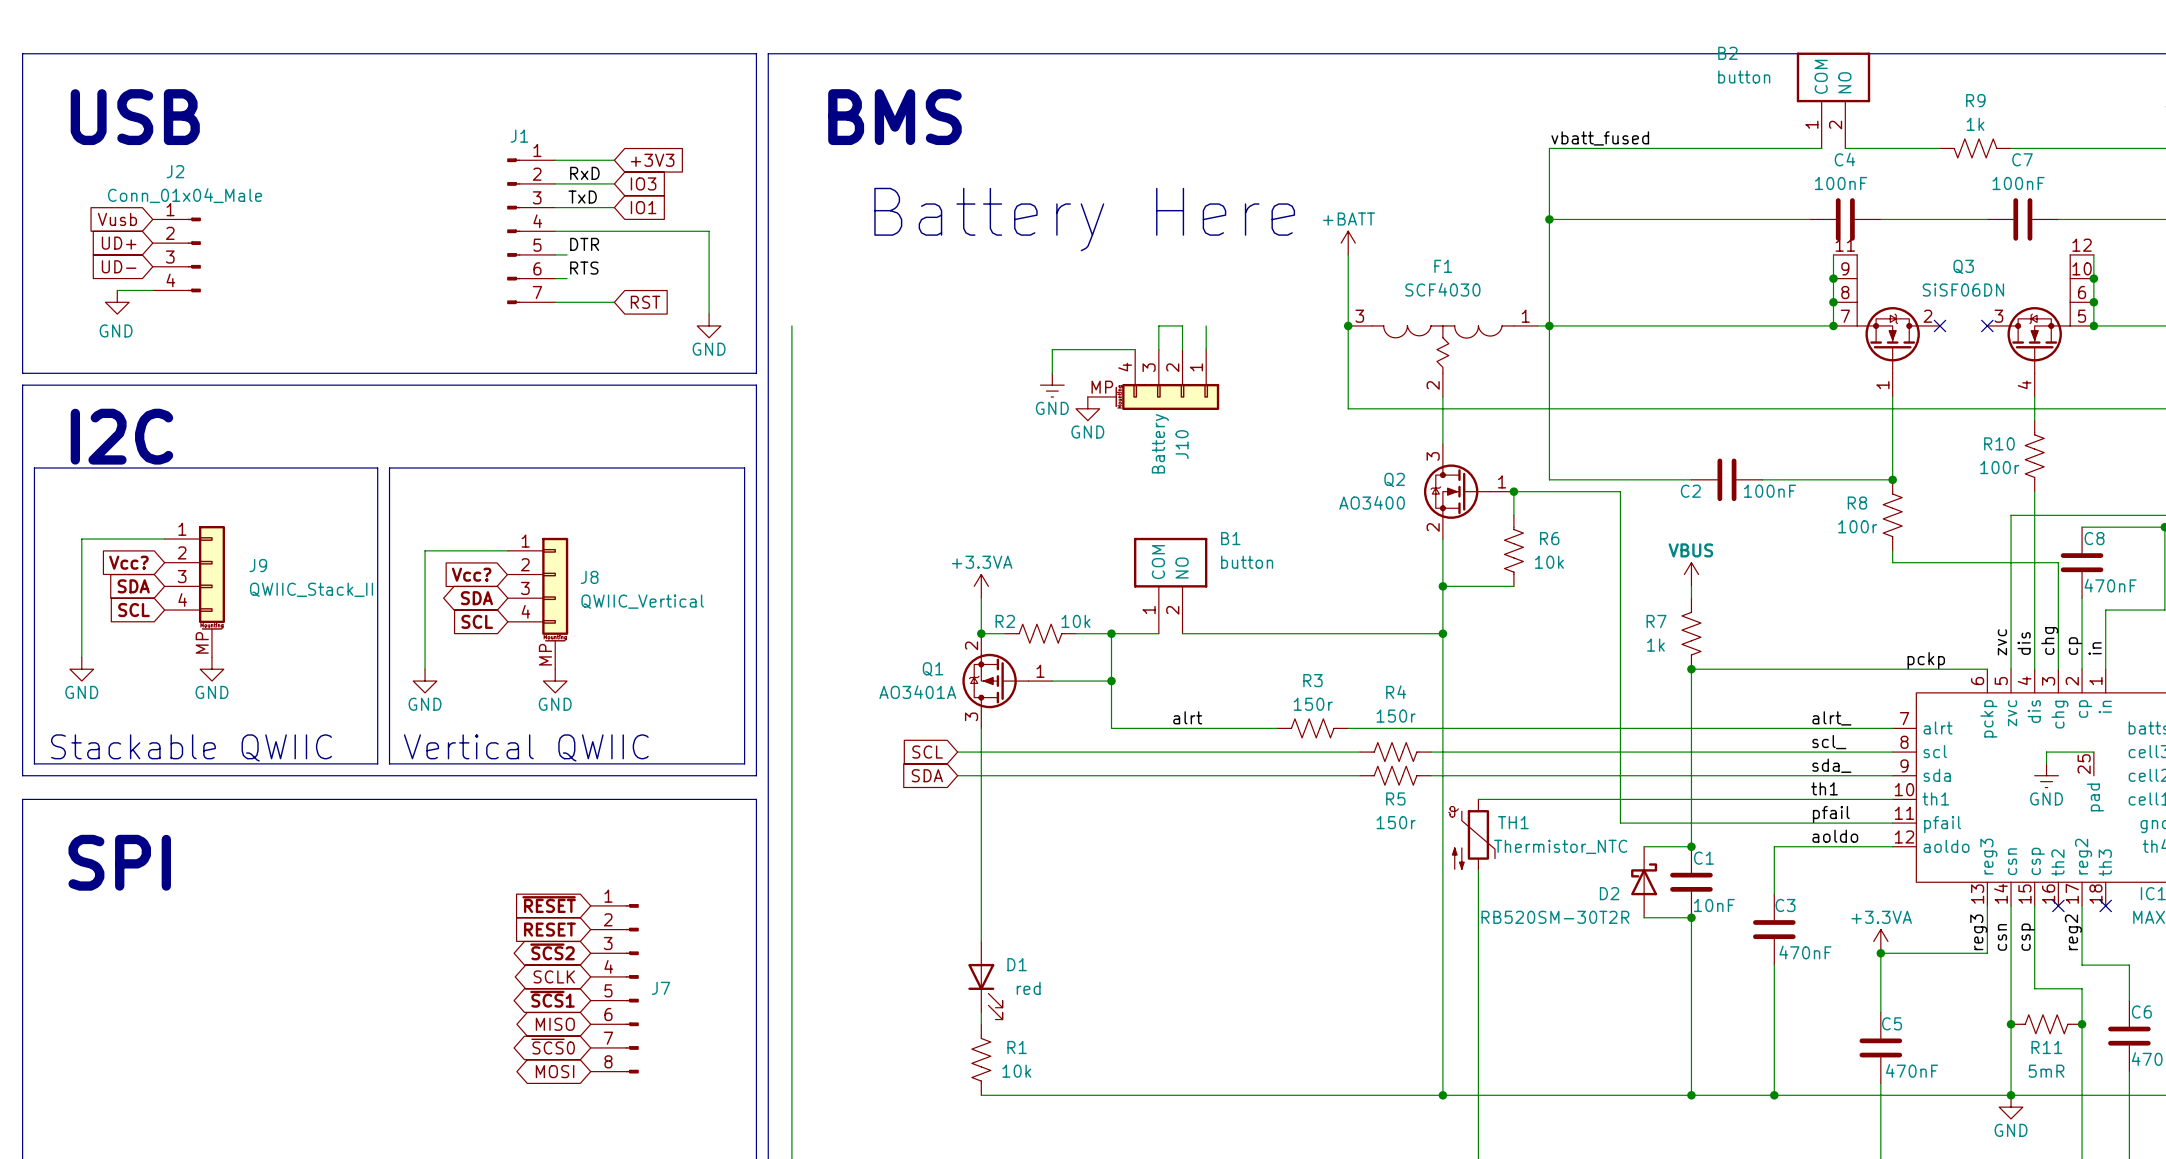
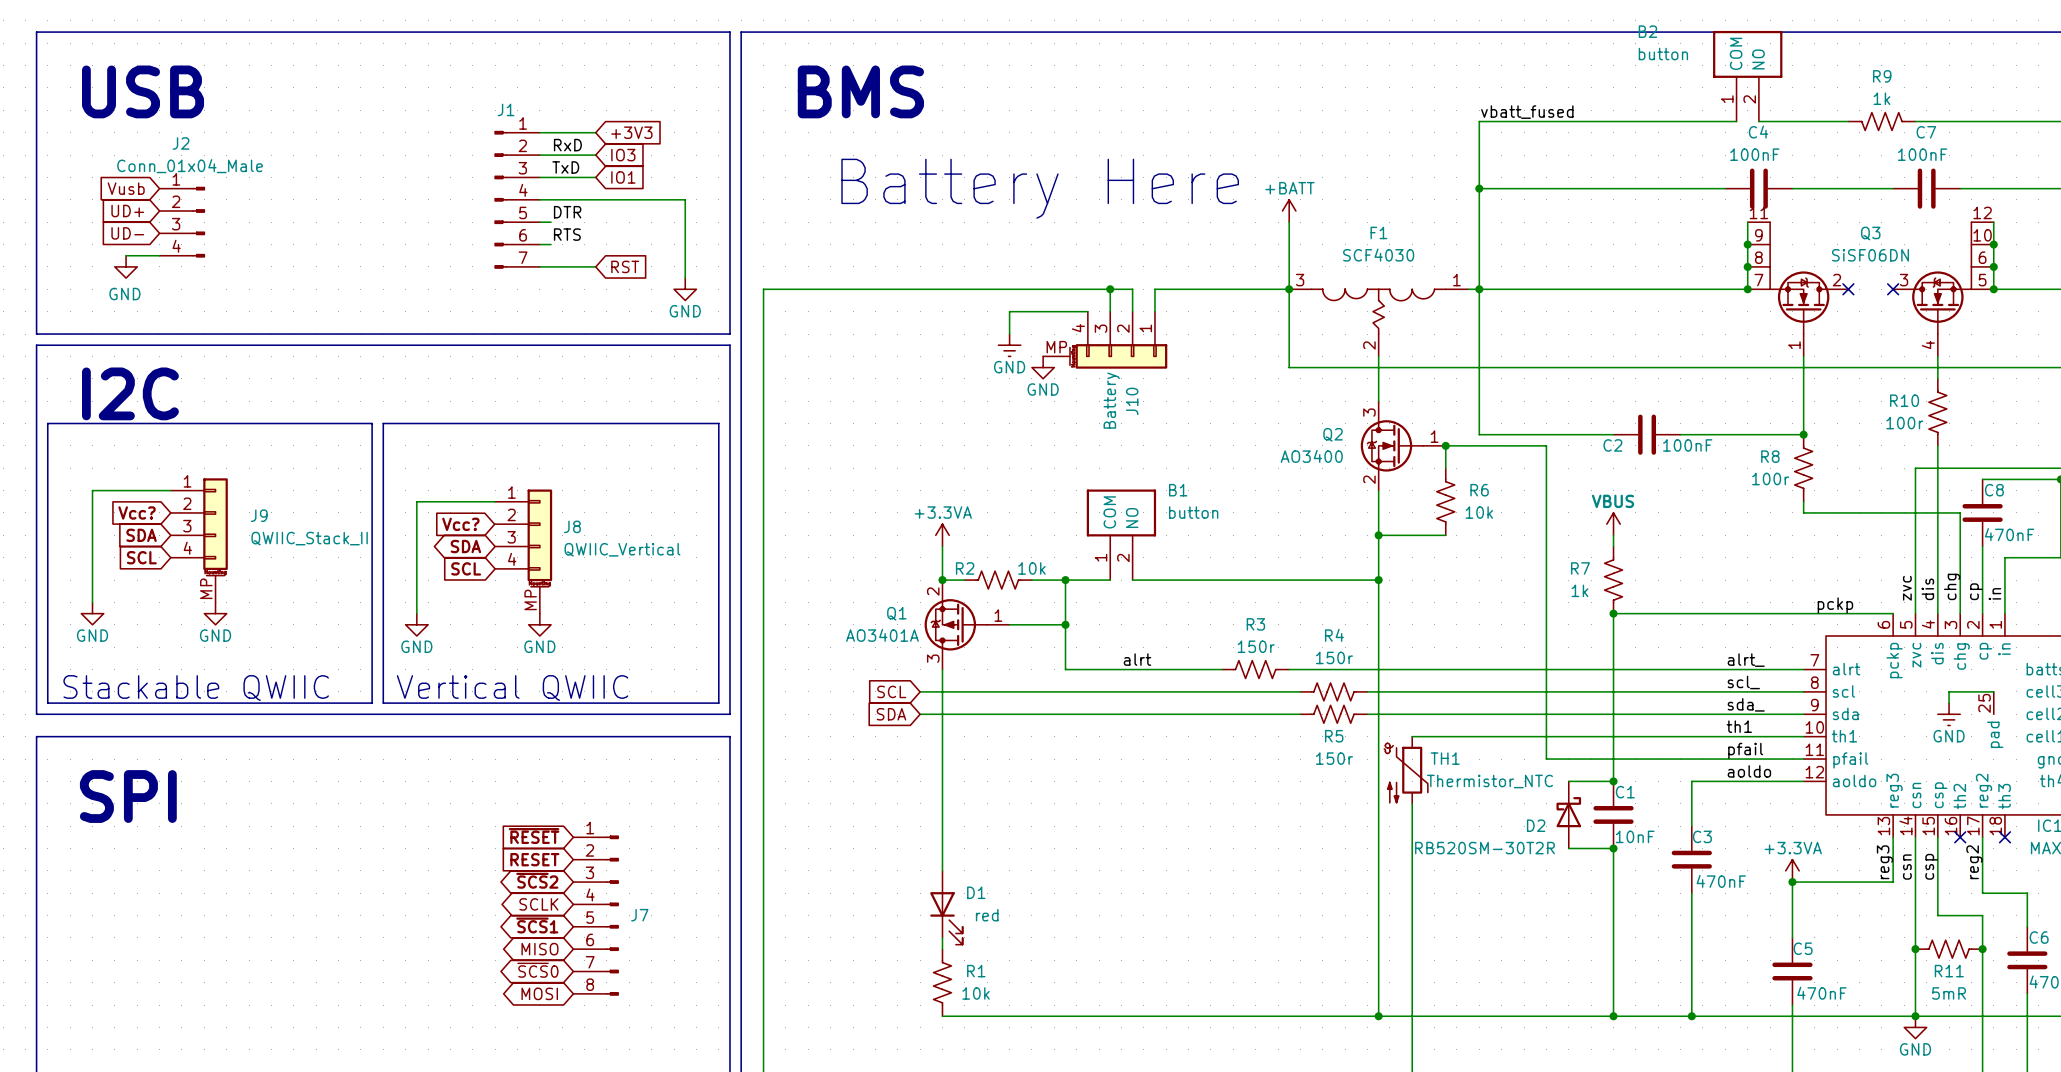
wire: none -> (763, 289) (1110, 289)
junction: none -> (1110, 289)
wire: none -> (1154, 289) (1289, 289)

